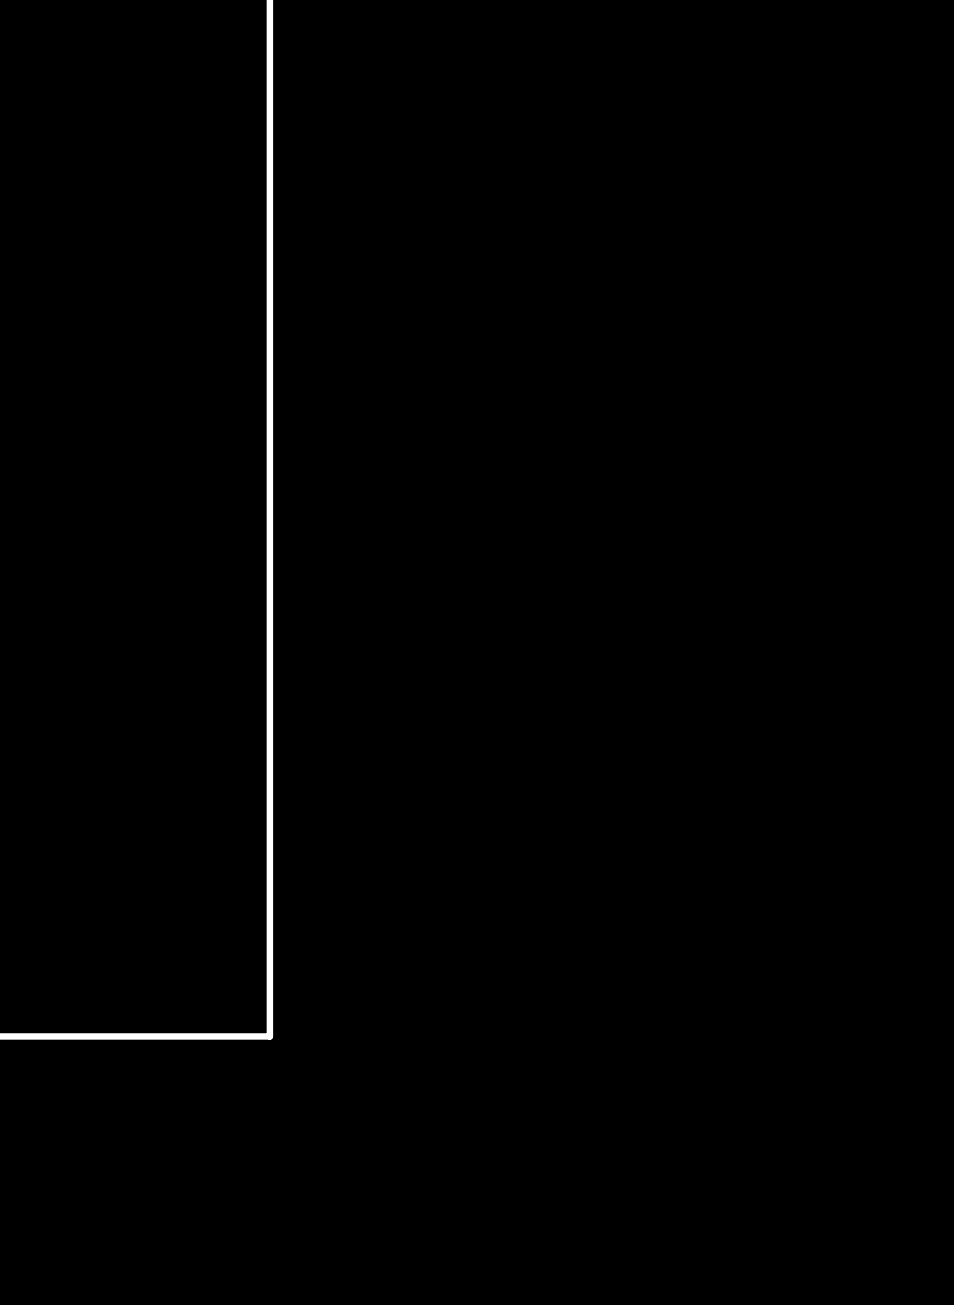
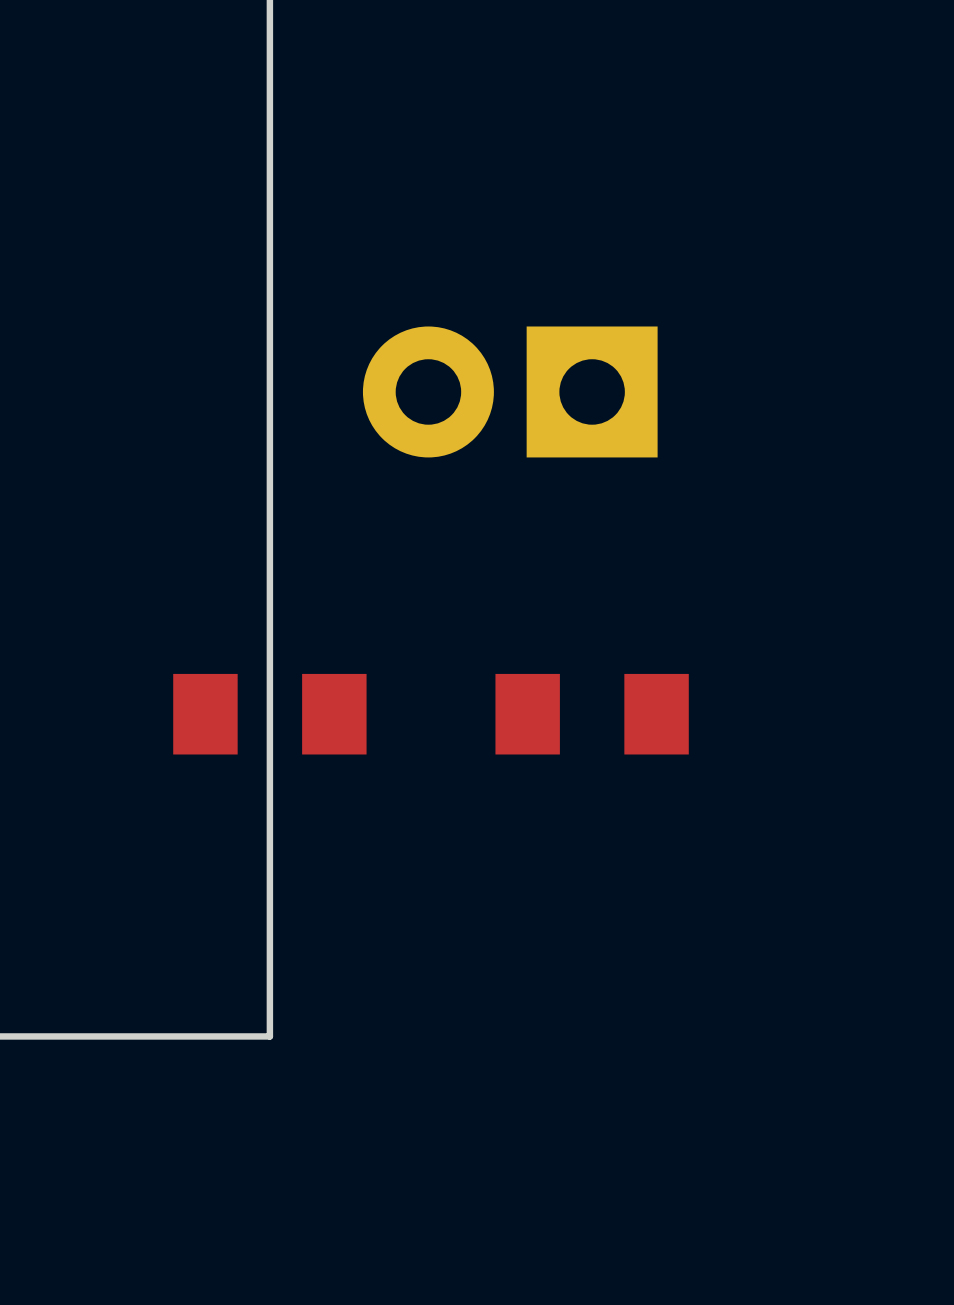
part: none -> (510, 391)
part: none -> (269, 714)
part: none -> (592, 714)

